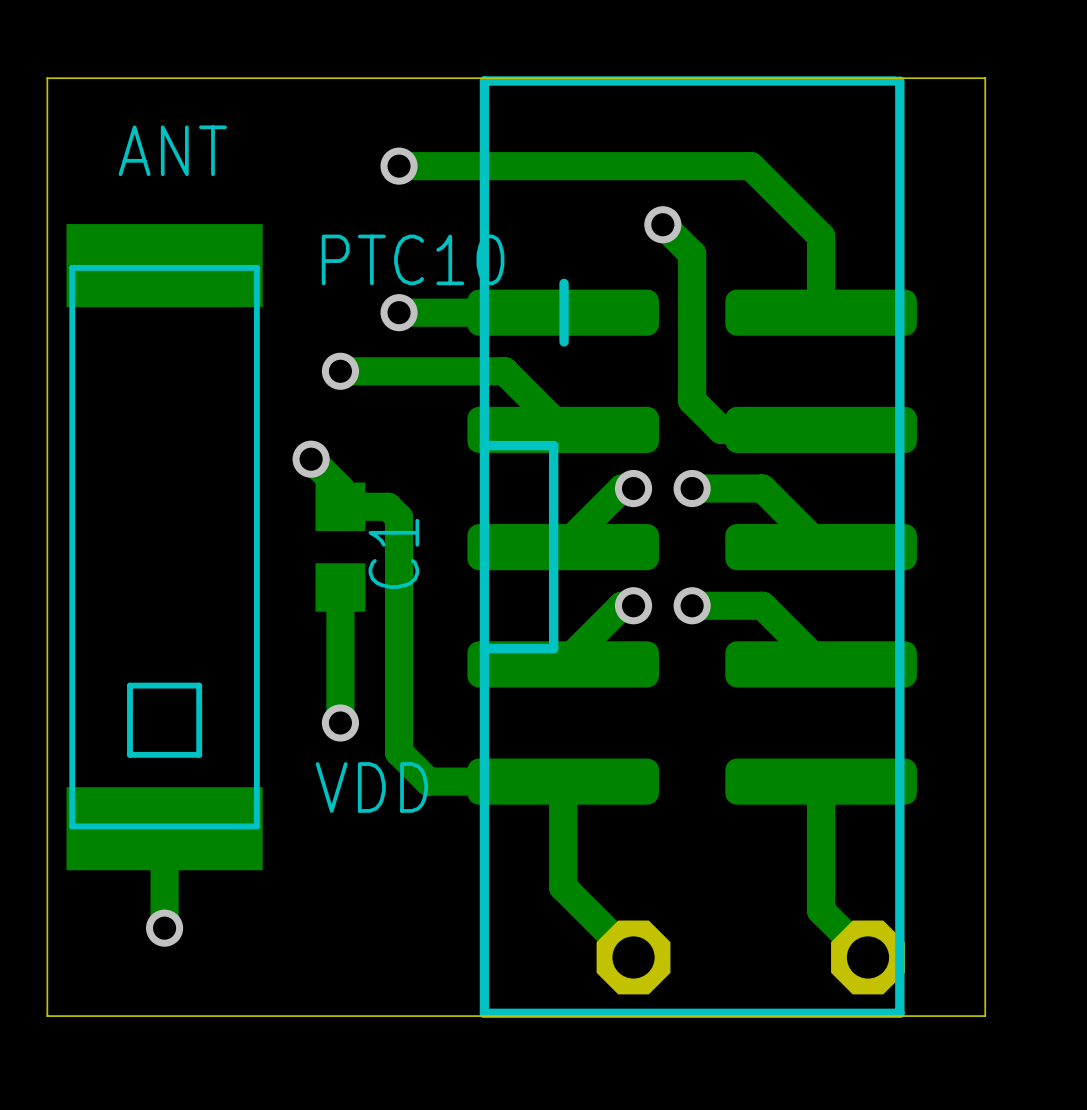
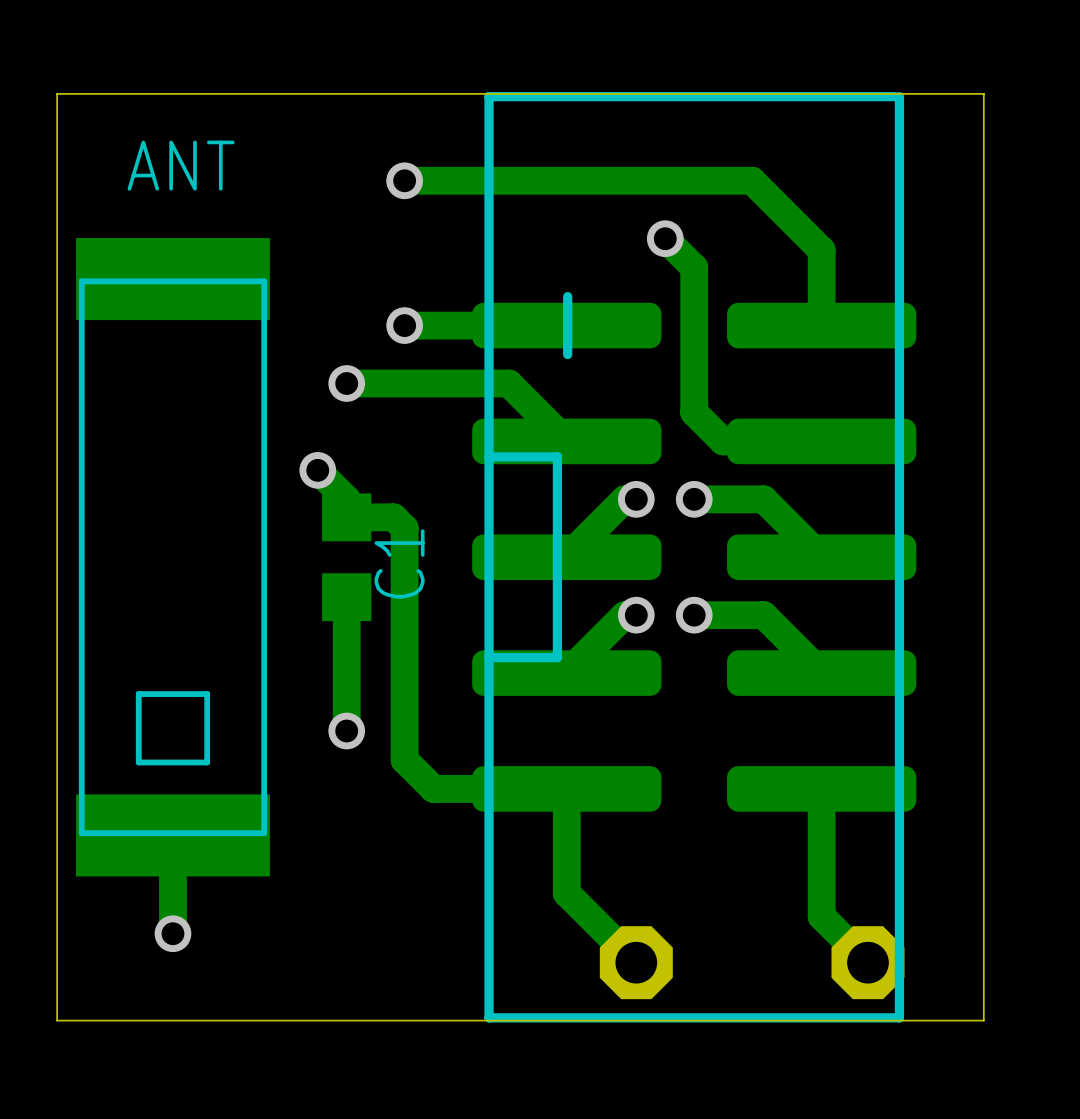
text: PTC10 (413, 259) -> none
text: VDD (371, 787) -> none

